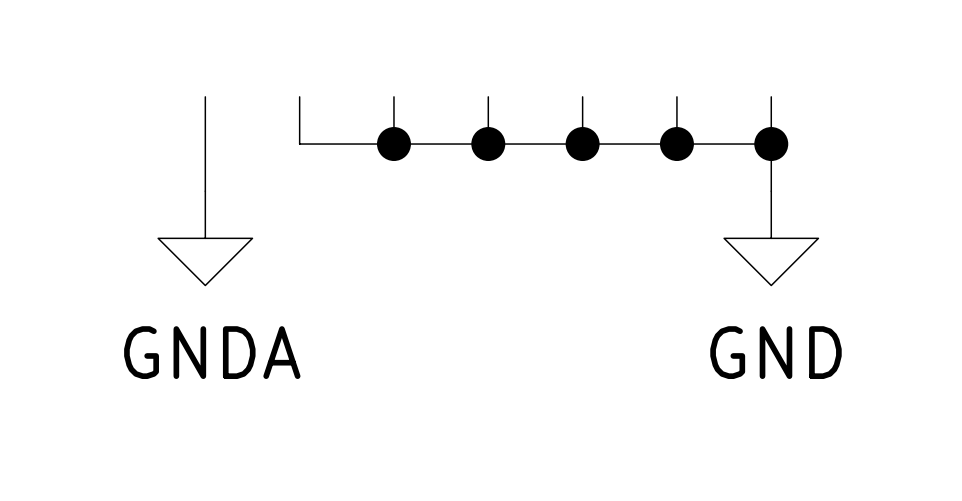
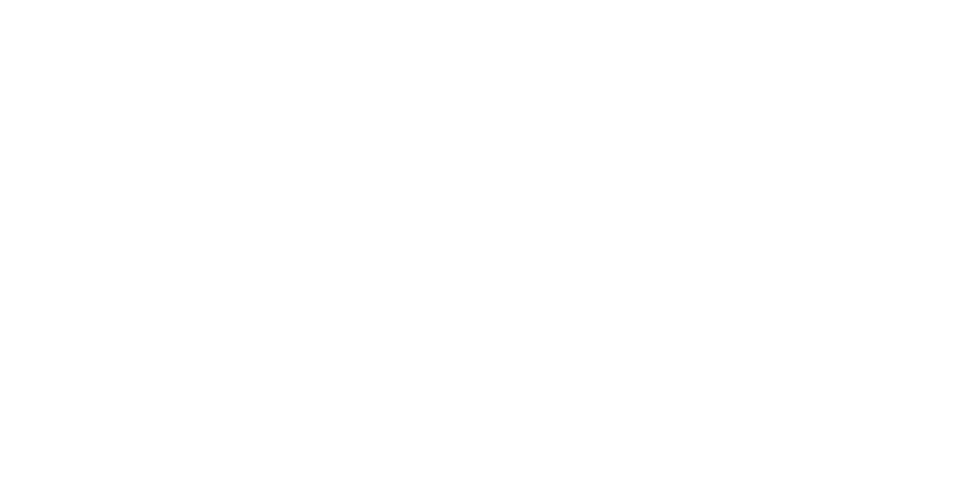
wire: (205, 96) (205, 191) -> none
wire: (299, 96) (299, 144) (771, 144) -> none
wire: (393, 96) (393, 144) -> none
wire: (488, 96) (488, 144) -> none
wire: (582, 96) (582, 144) -> none
wire: (676, 96) (676, 144) -> none
wire: (771, 96) (771, 191) -> none
junction: (393, 144) -> none
junction: (488, 144) -> none
junction: (582, 144) -> none
junction: (676, 144) -> none
junction: (771, 144) -> none
power symbol: GNDA (205, 238) -> none
power symbol: GND (771, 238) -> none

